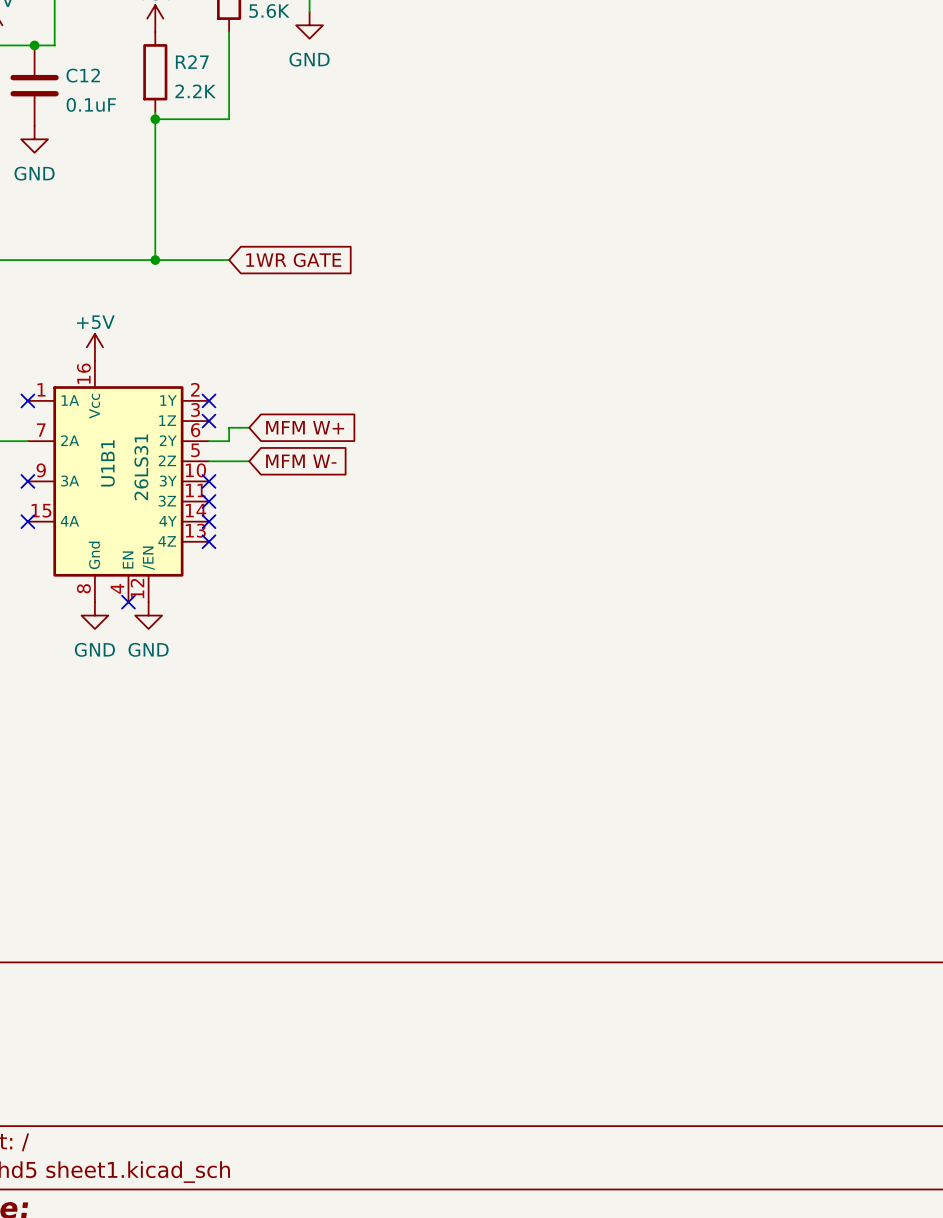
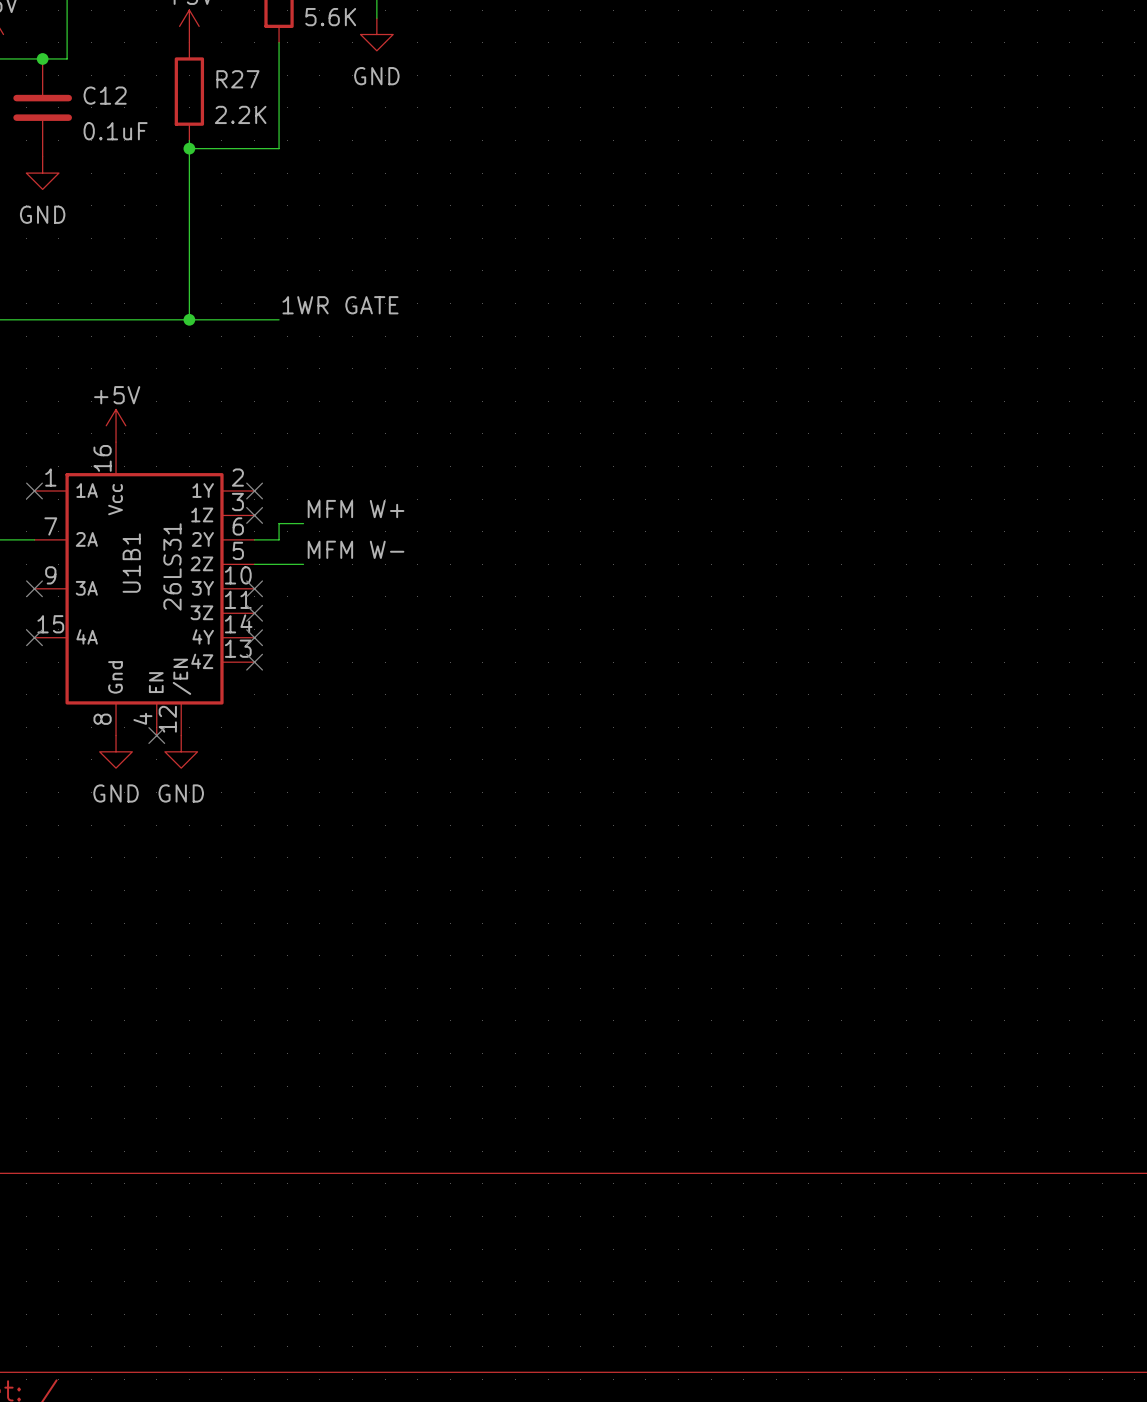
label: none -> 1WR GATE (340, 305)
global label: 1WR GATE (293, 260) -> none
label: none -> MFM W+ (356, 509)
global label: MFM W+ (305, 427) -> none
label: none -> MFM W- (356, 549)
global label: MFM W- (301, 461) -> none

